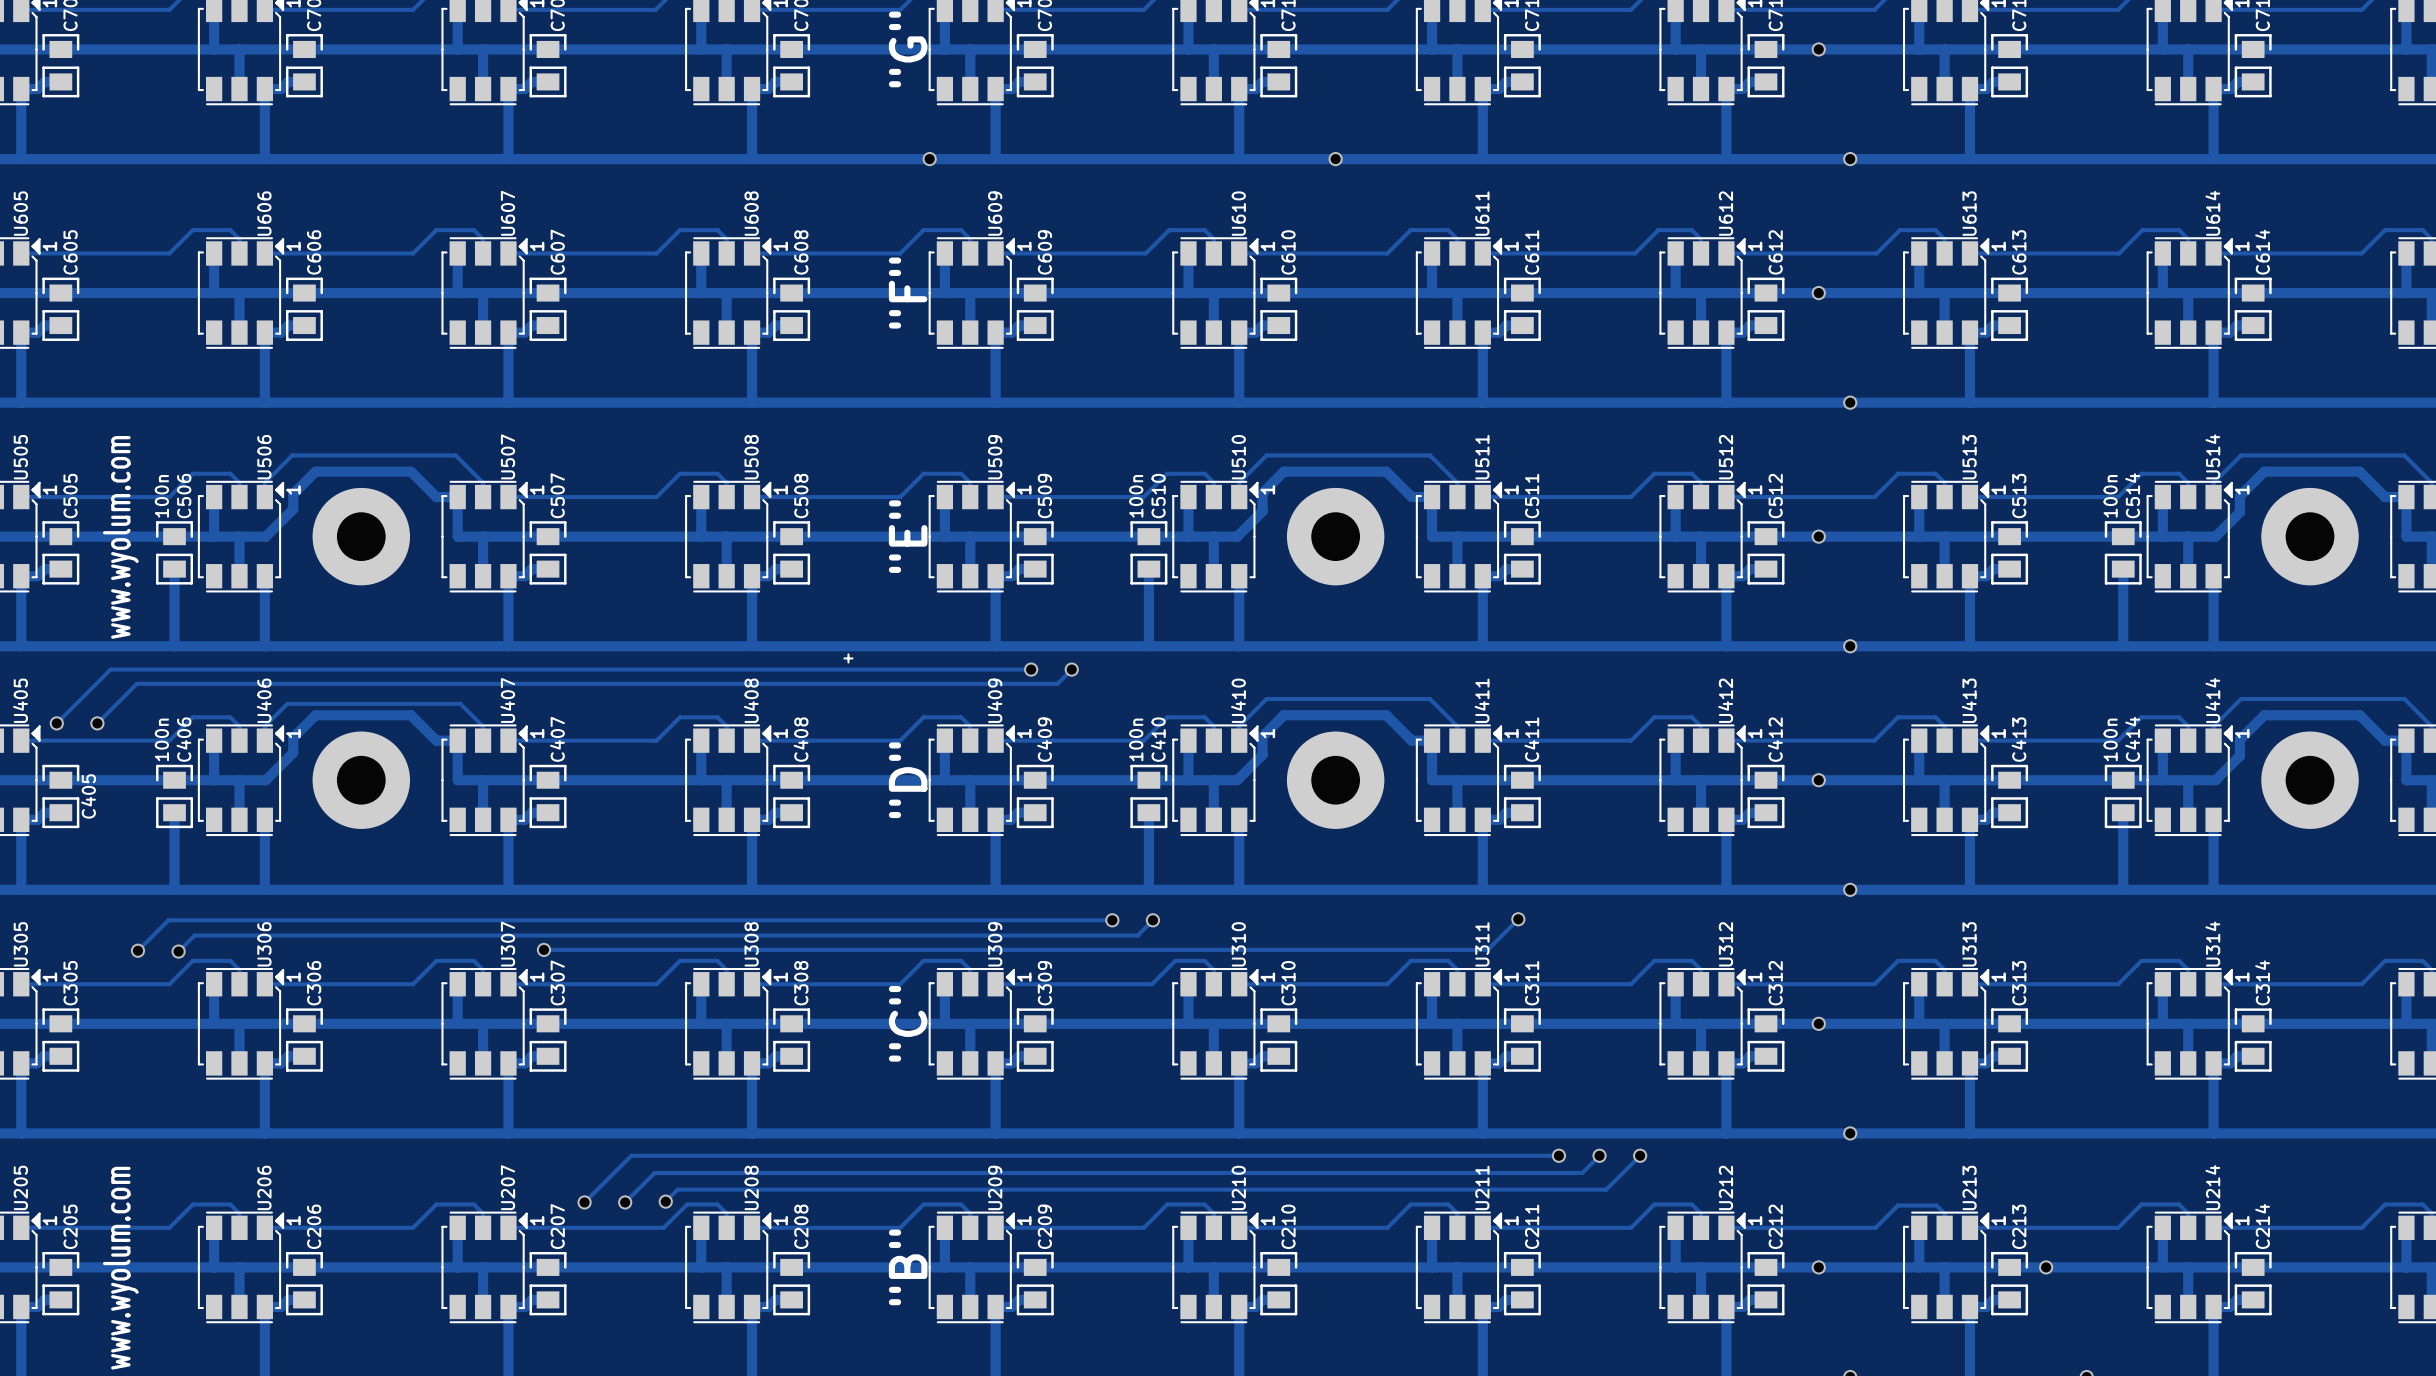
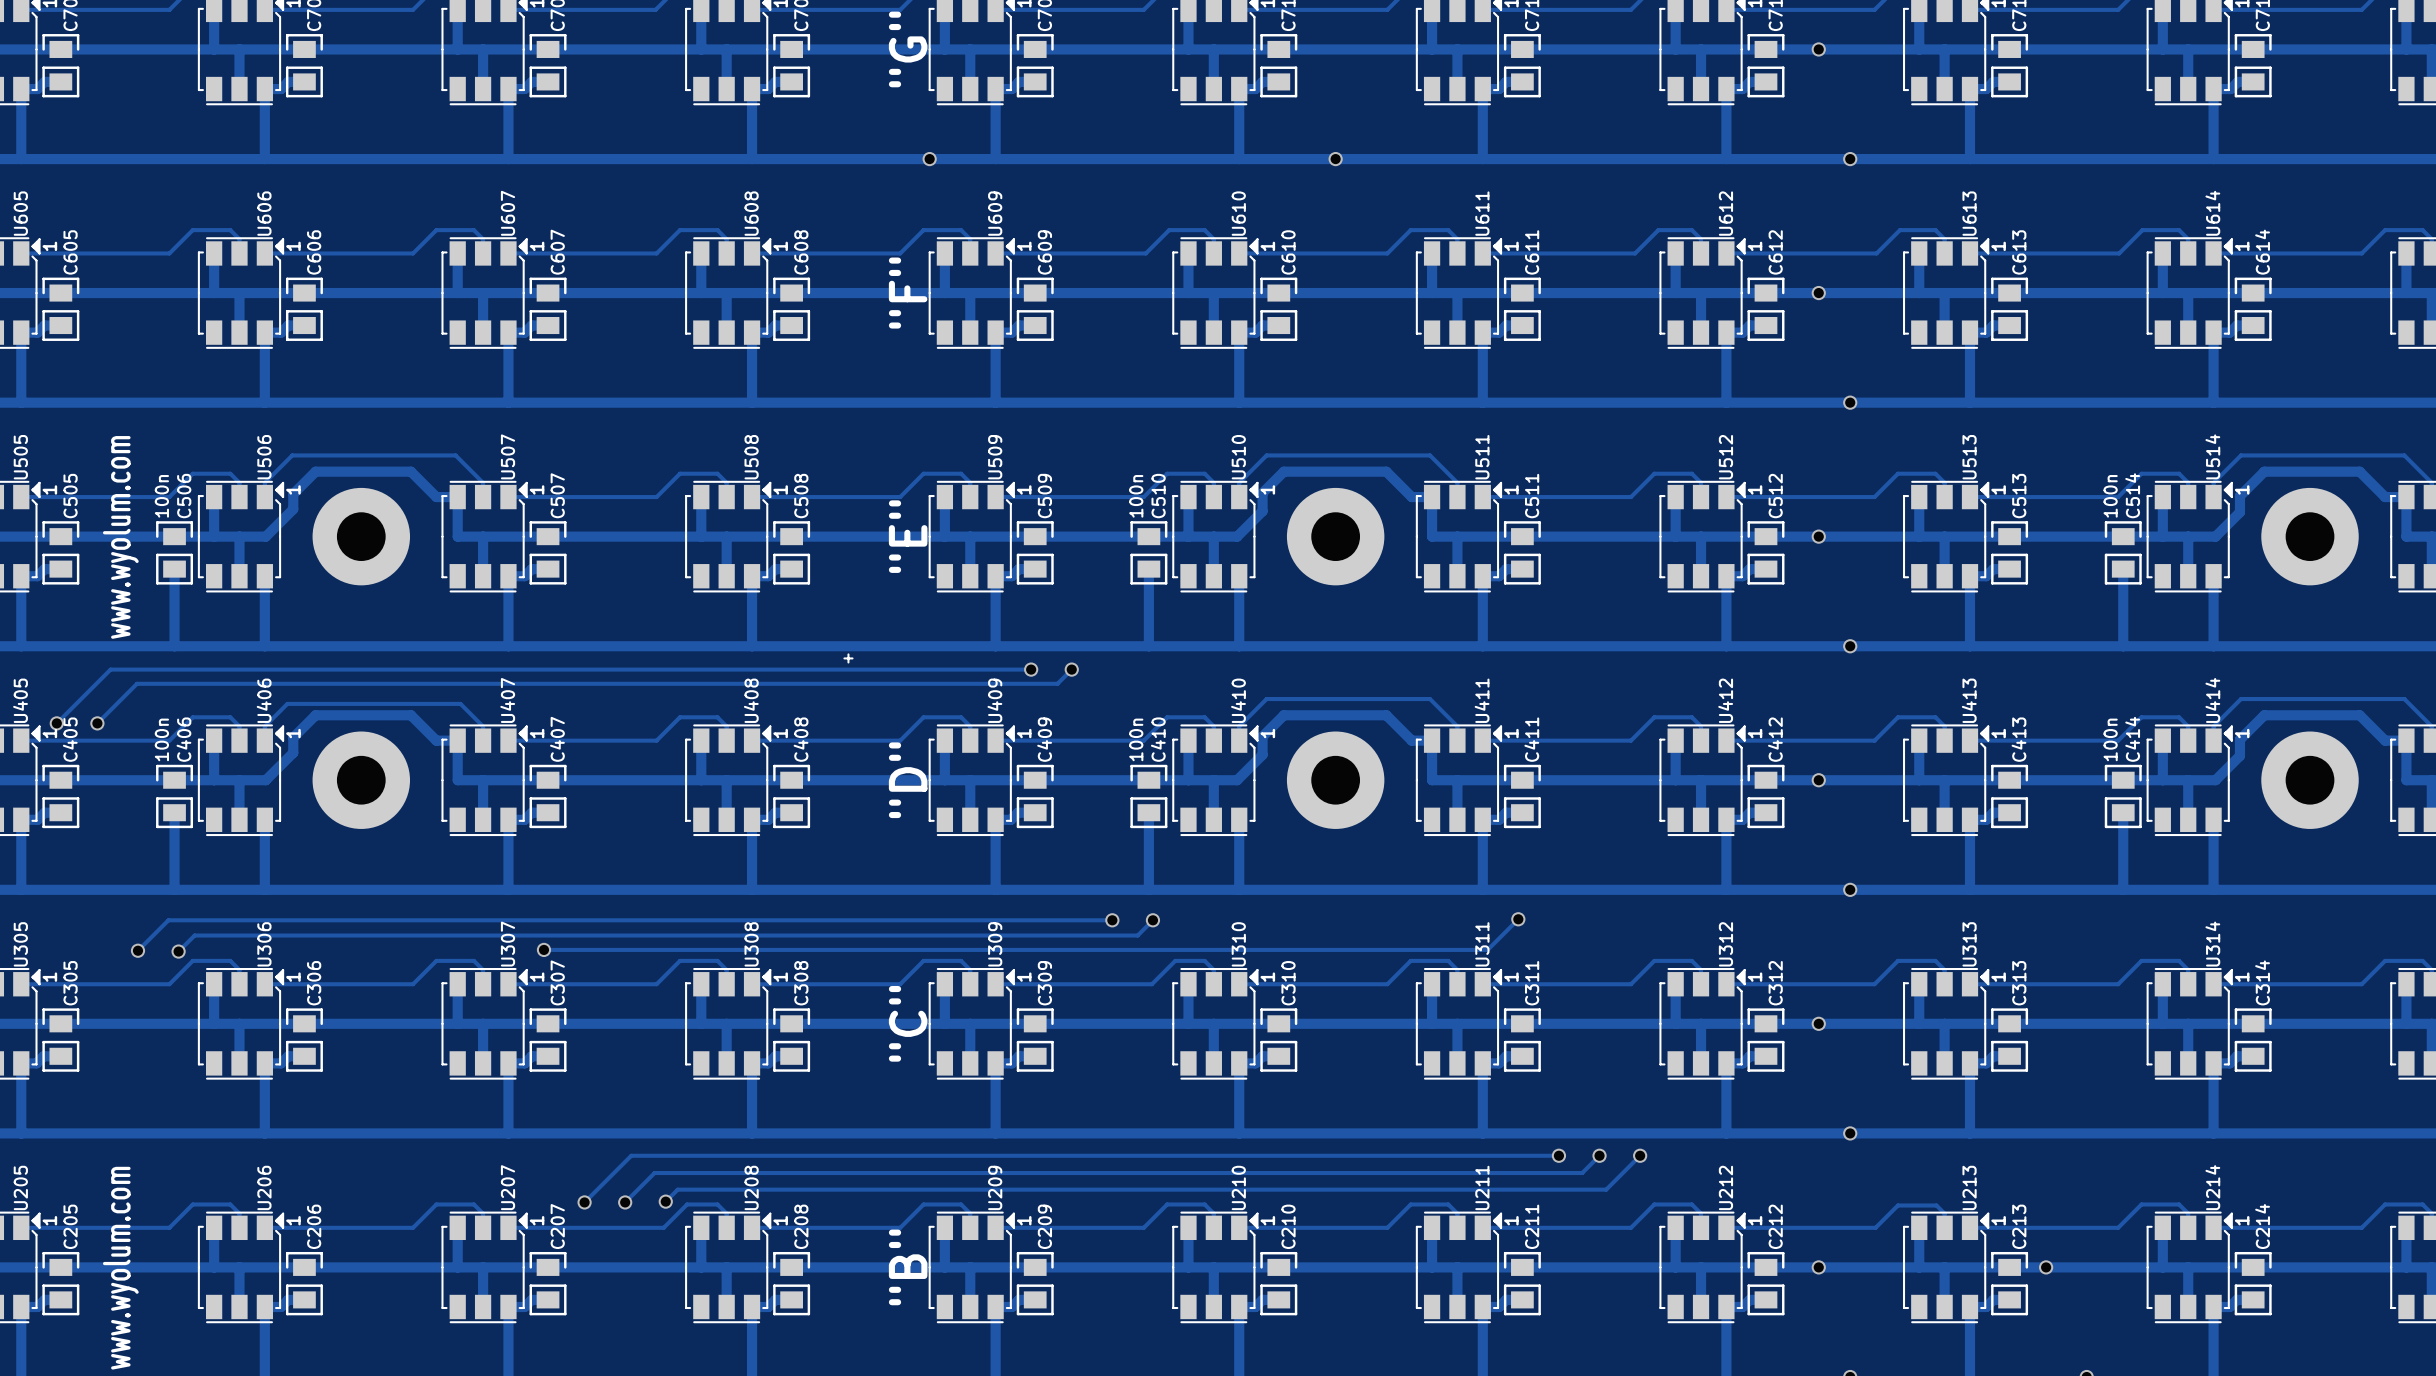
U405 text: none -> 1 (49, 733)
C405 name position: C405 (88, 796) -> C405 (70, 739)

